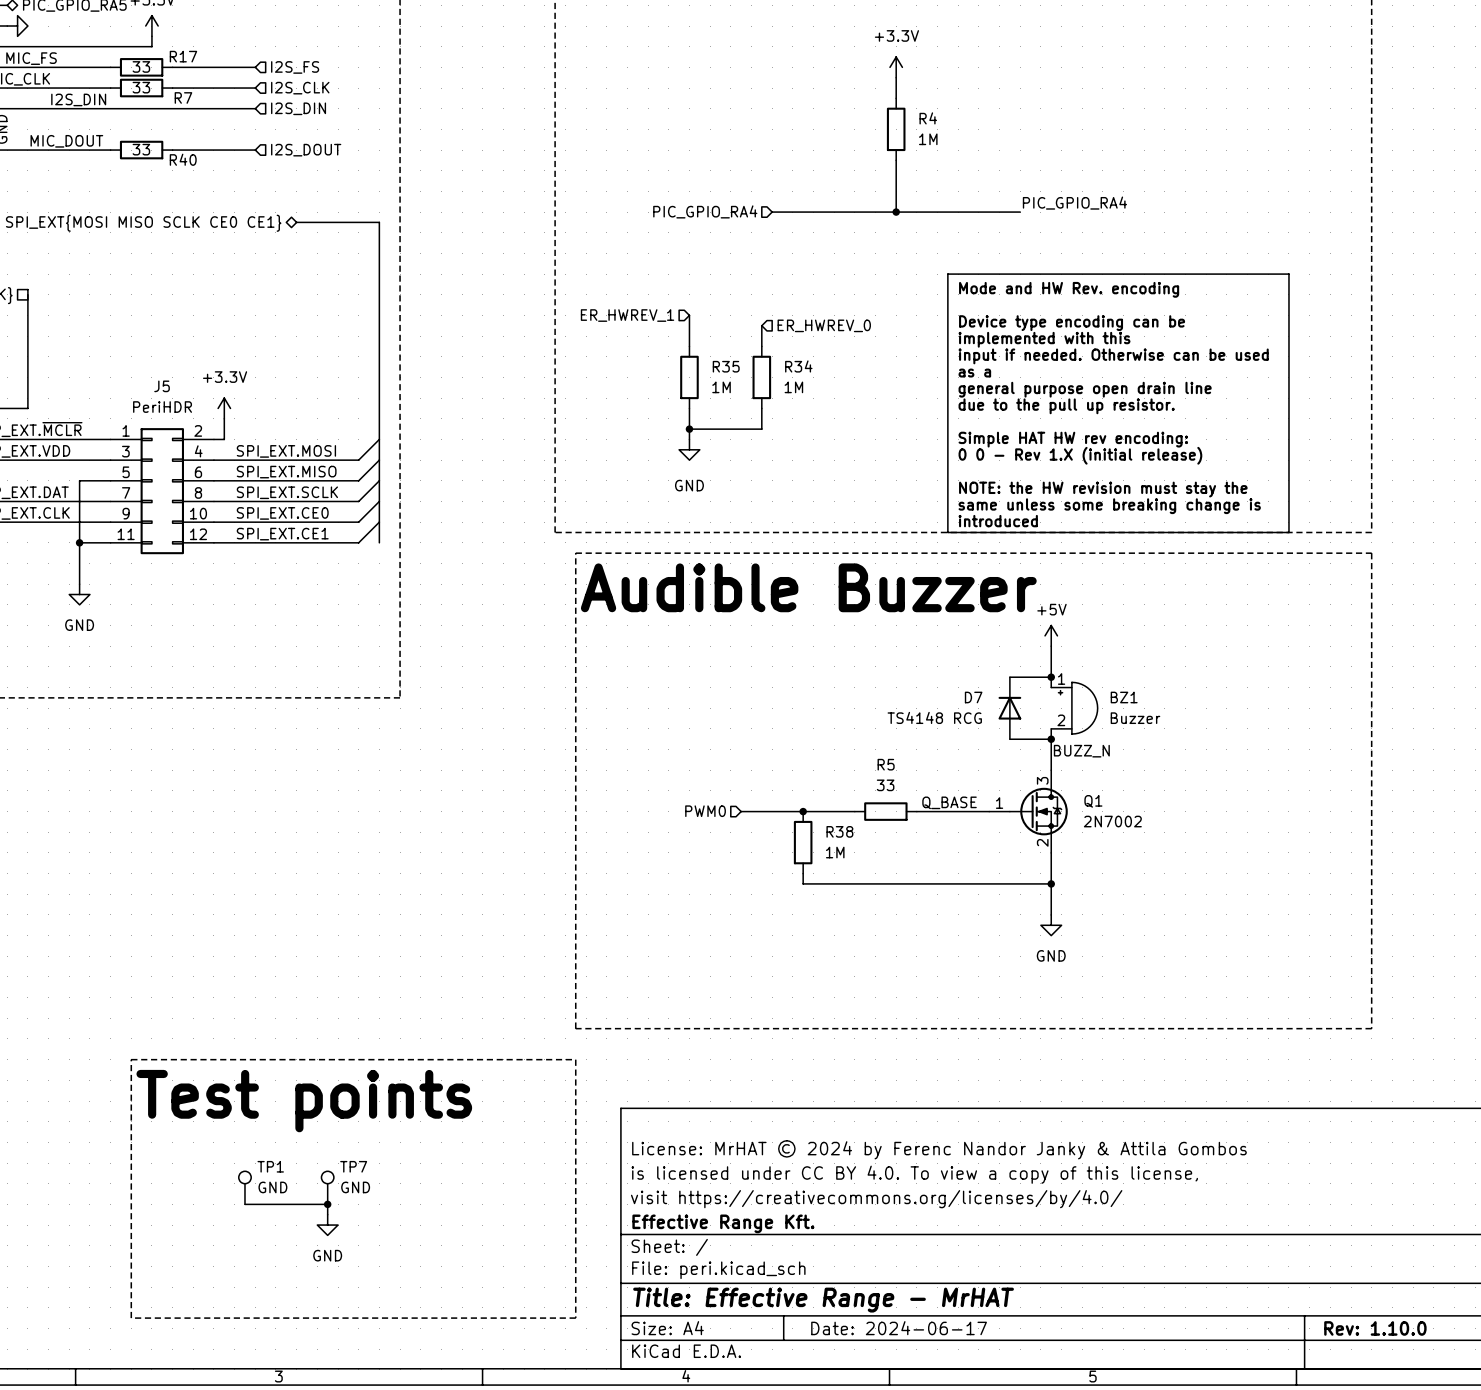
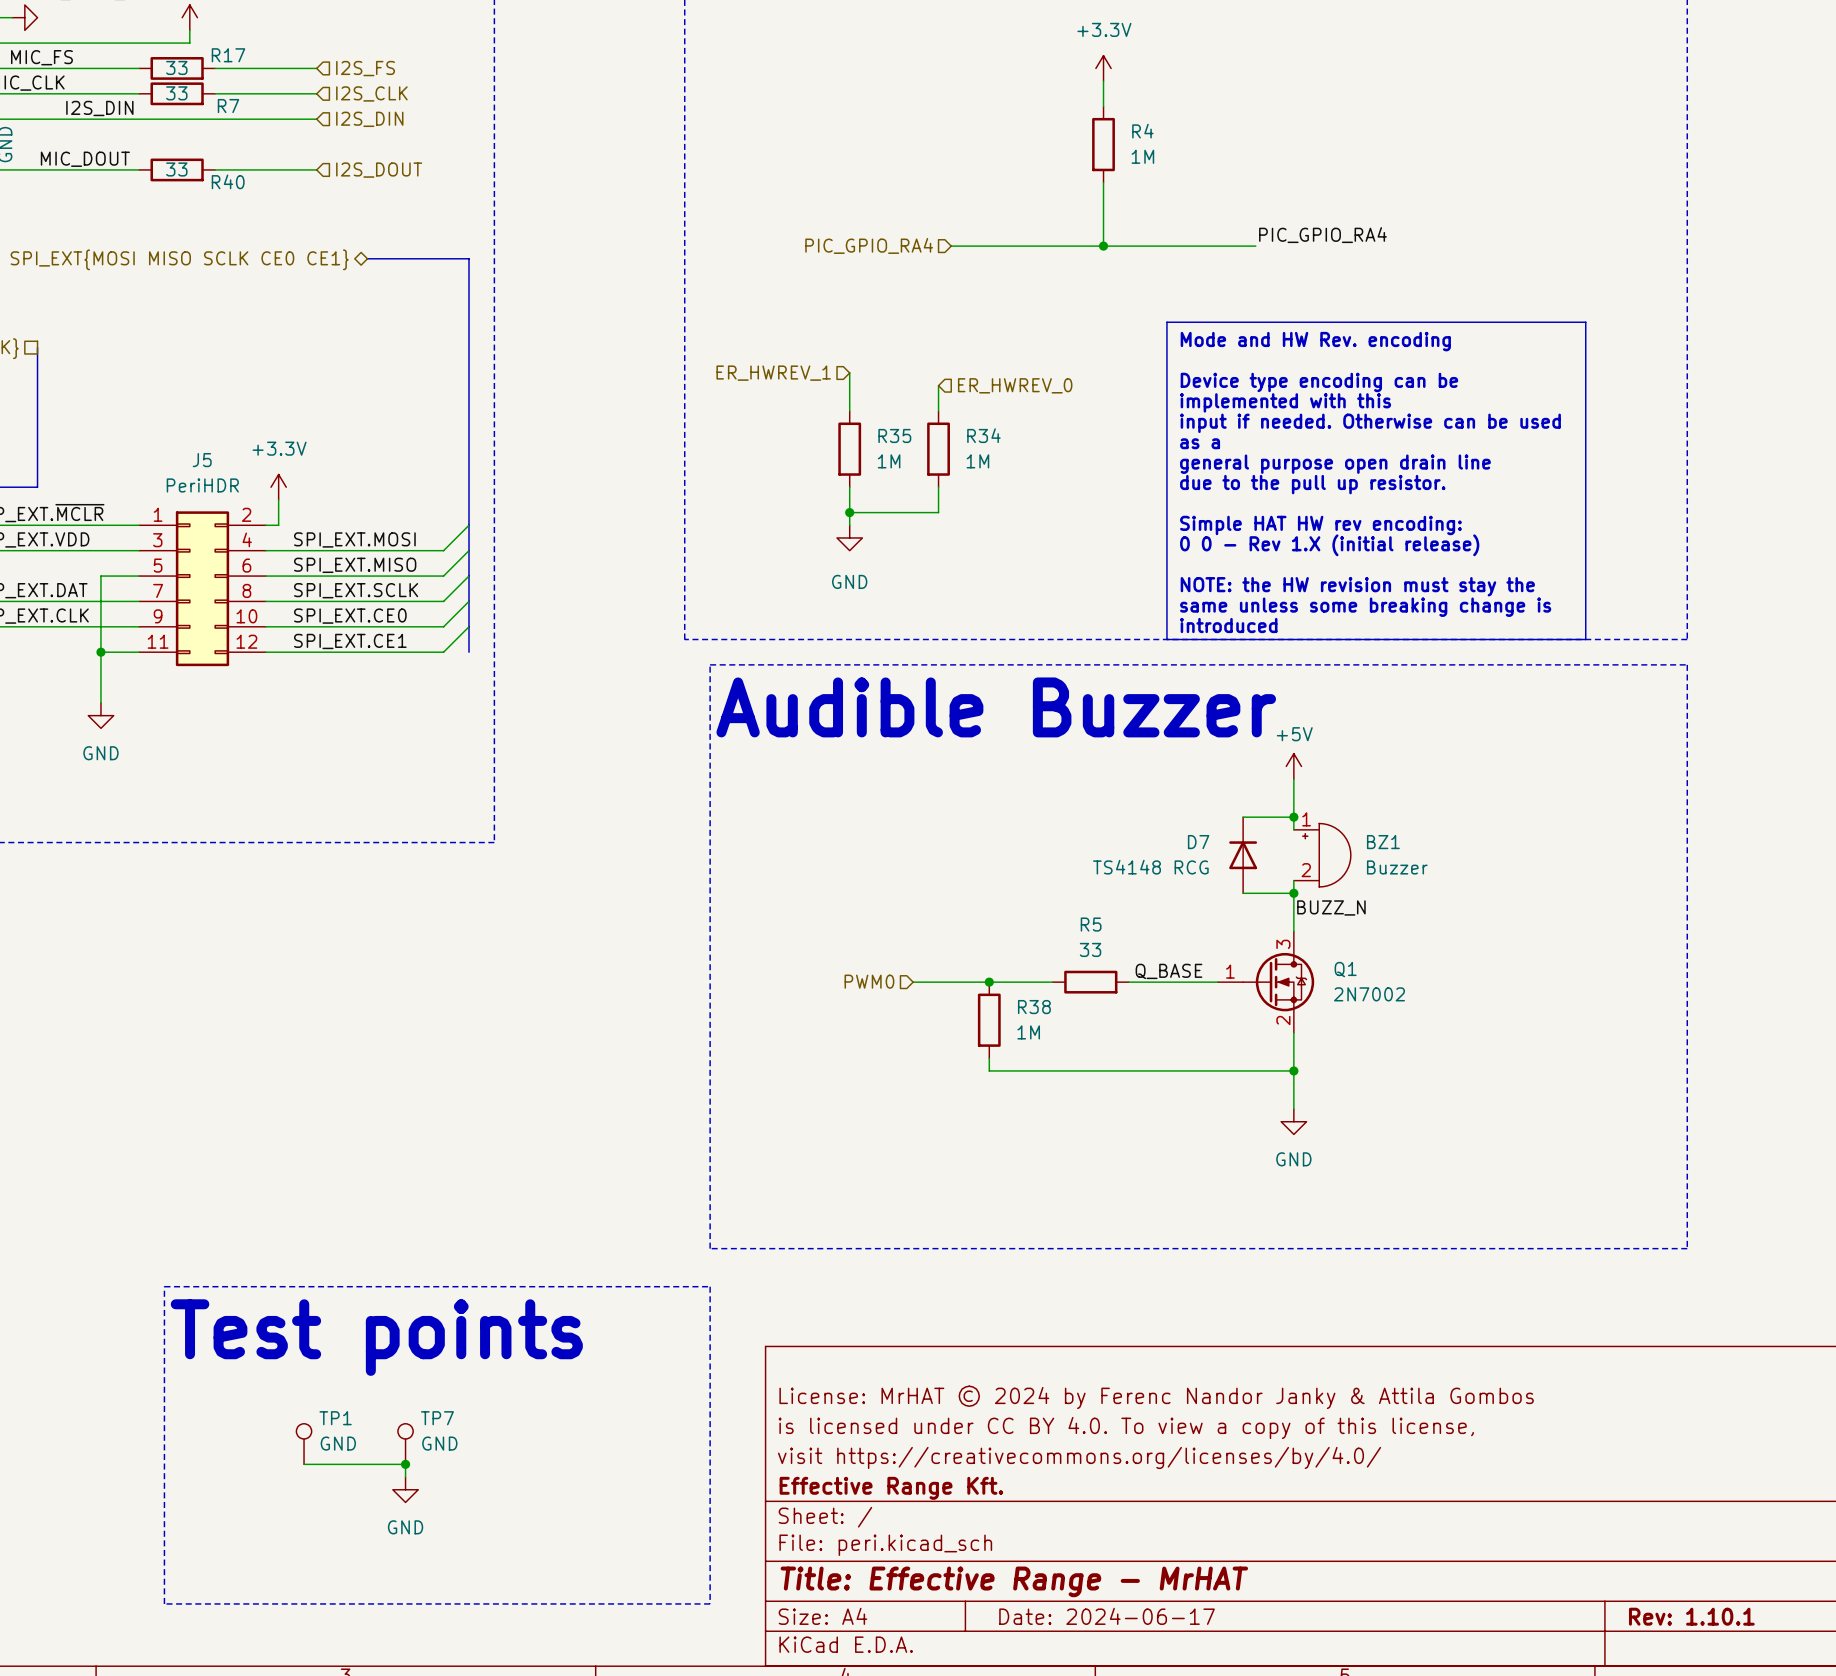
title block: Rev: 1.10.0 (1375, 1328) -> Rev: 1.10.1 (1691, 1616)

